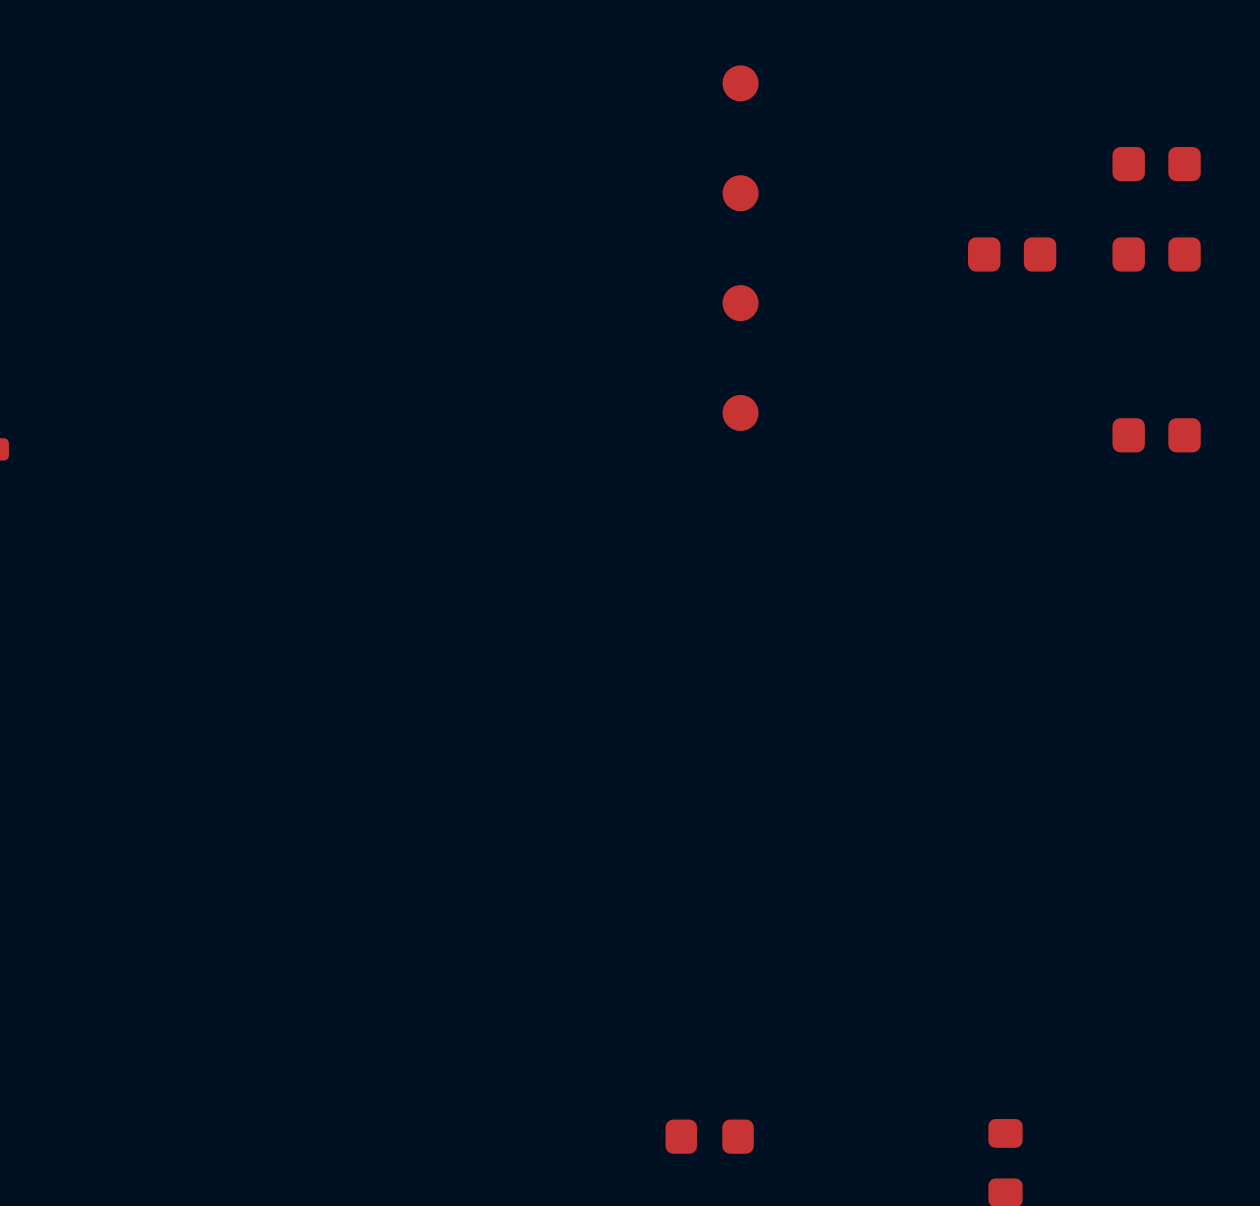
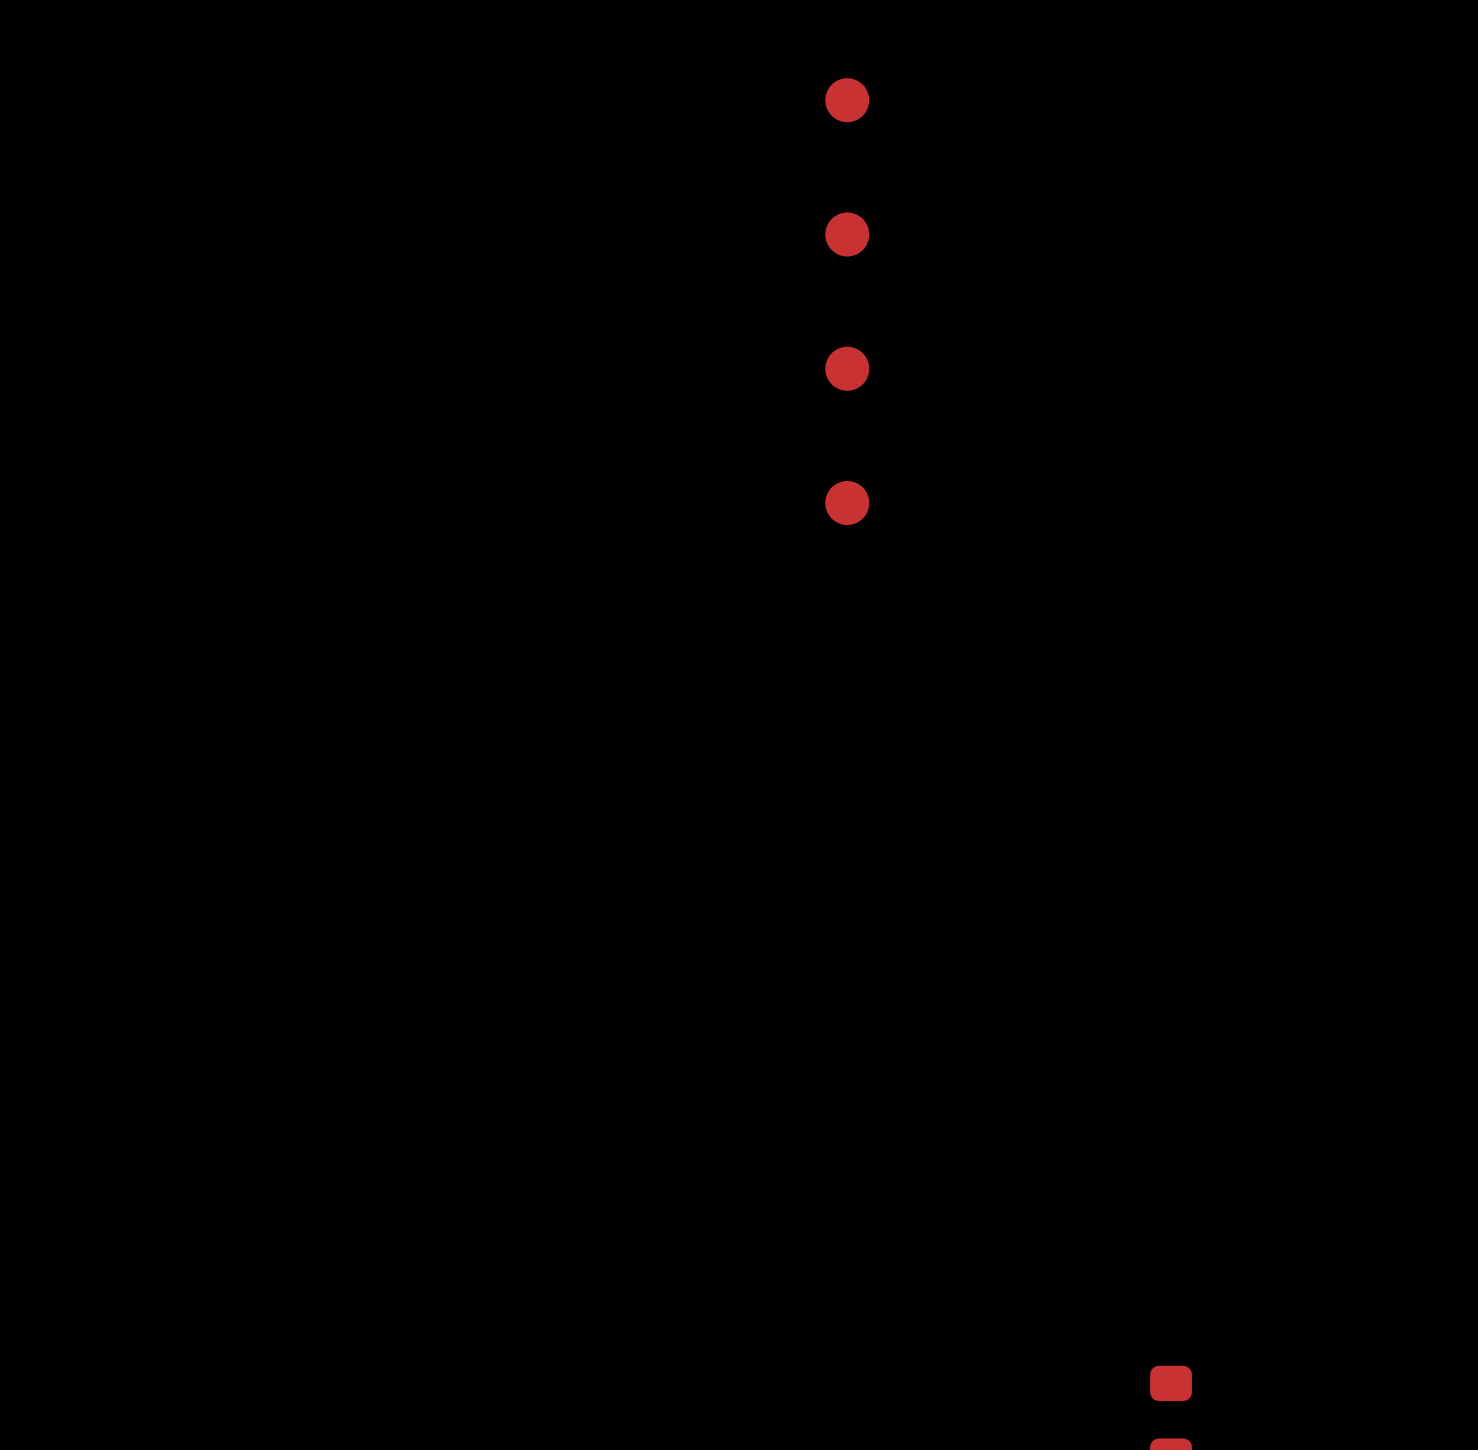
part: (1156, 164) -> none
part: (1012, 254) -> none
part: (1156, 254) -> none
part: (1156, 435) -> none
part: (709, 1136) -> none

